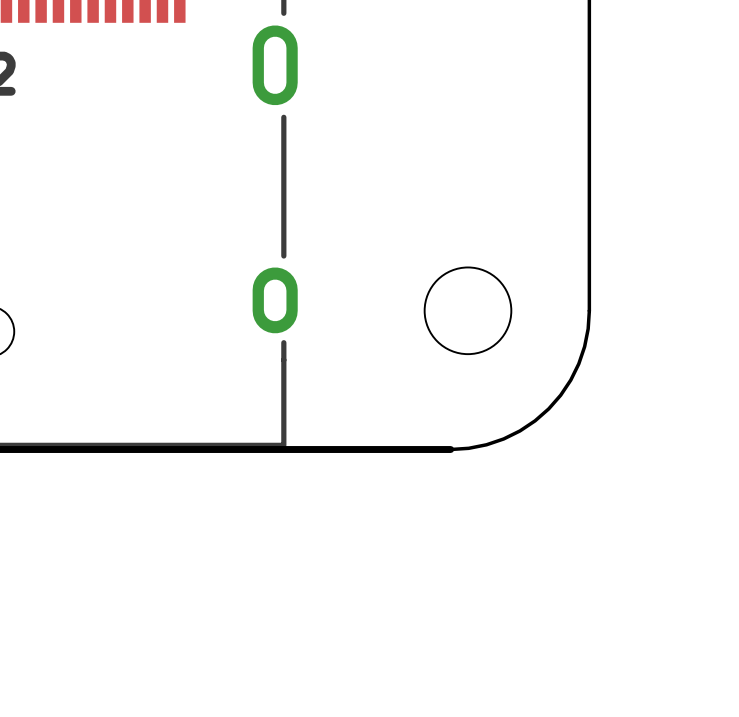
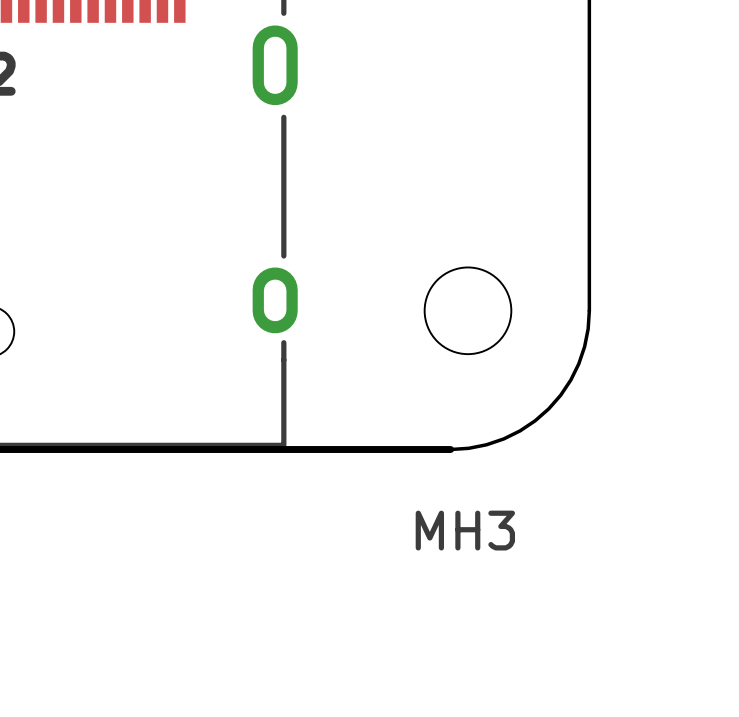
MH3 name: none -> MH3 (465, 530)

